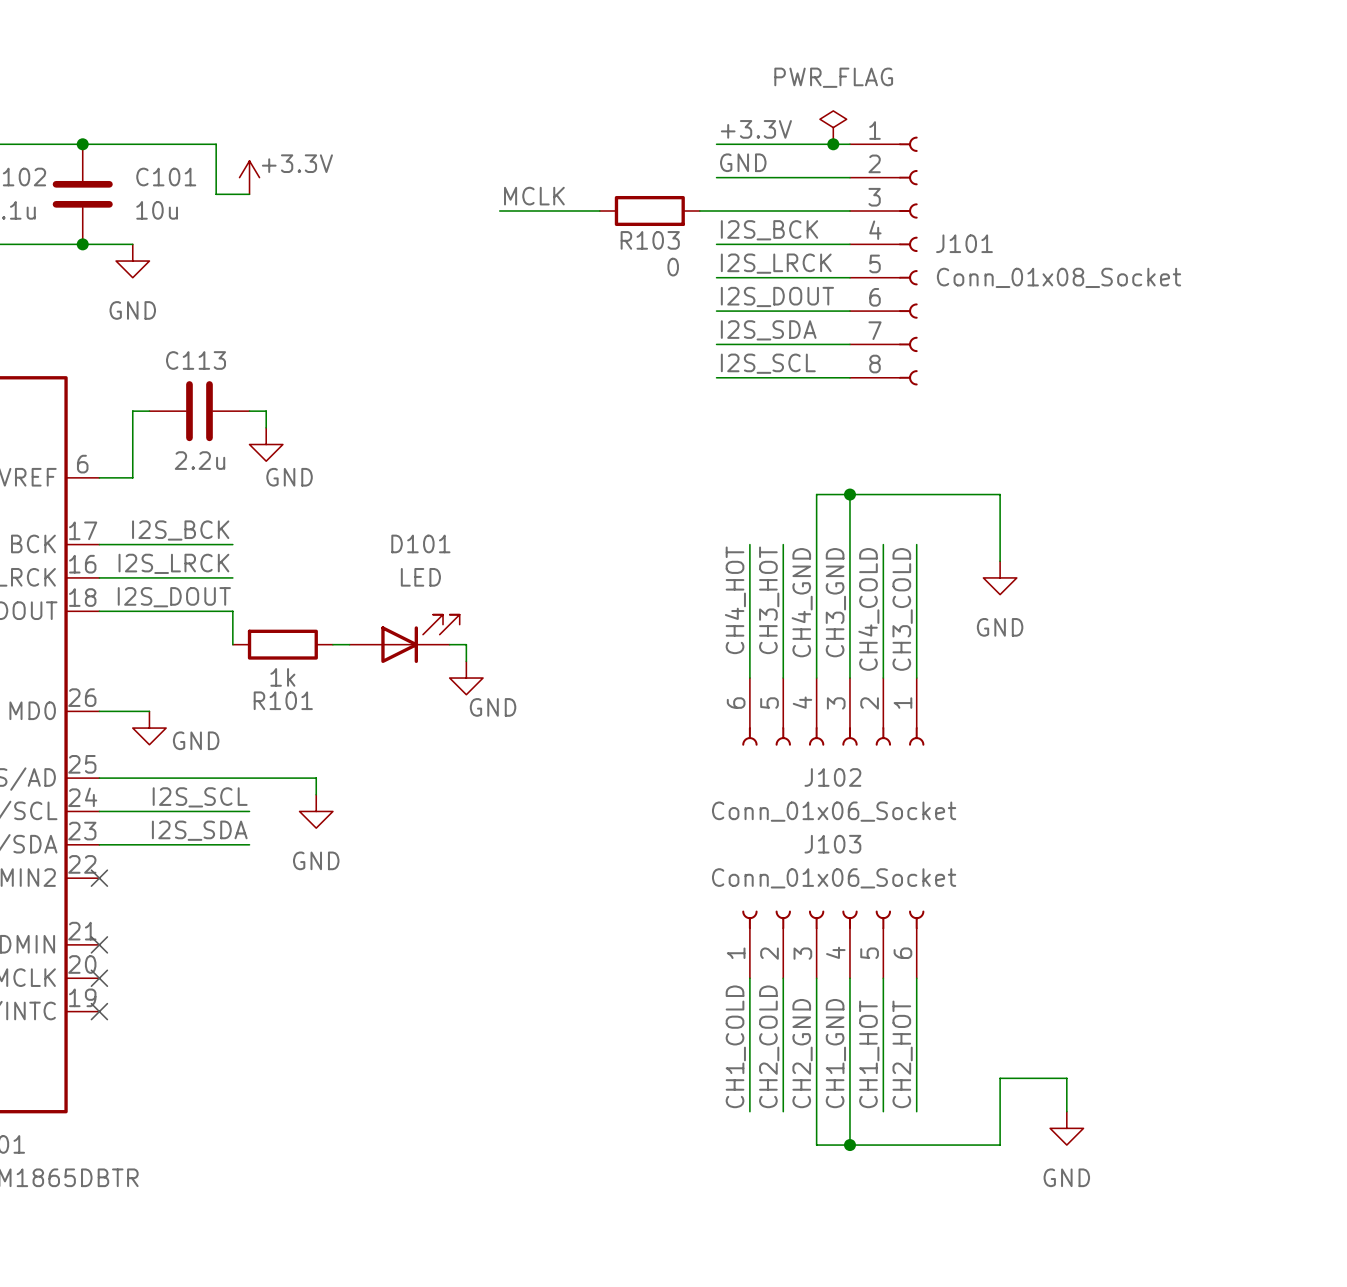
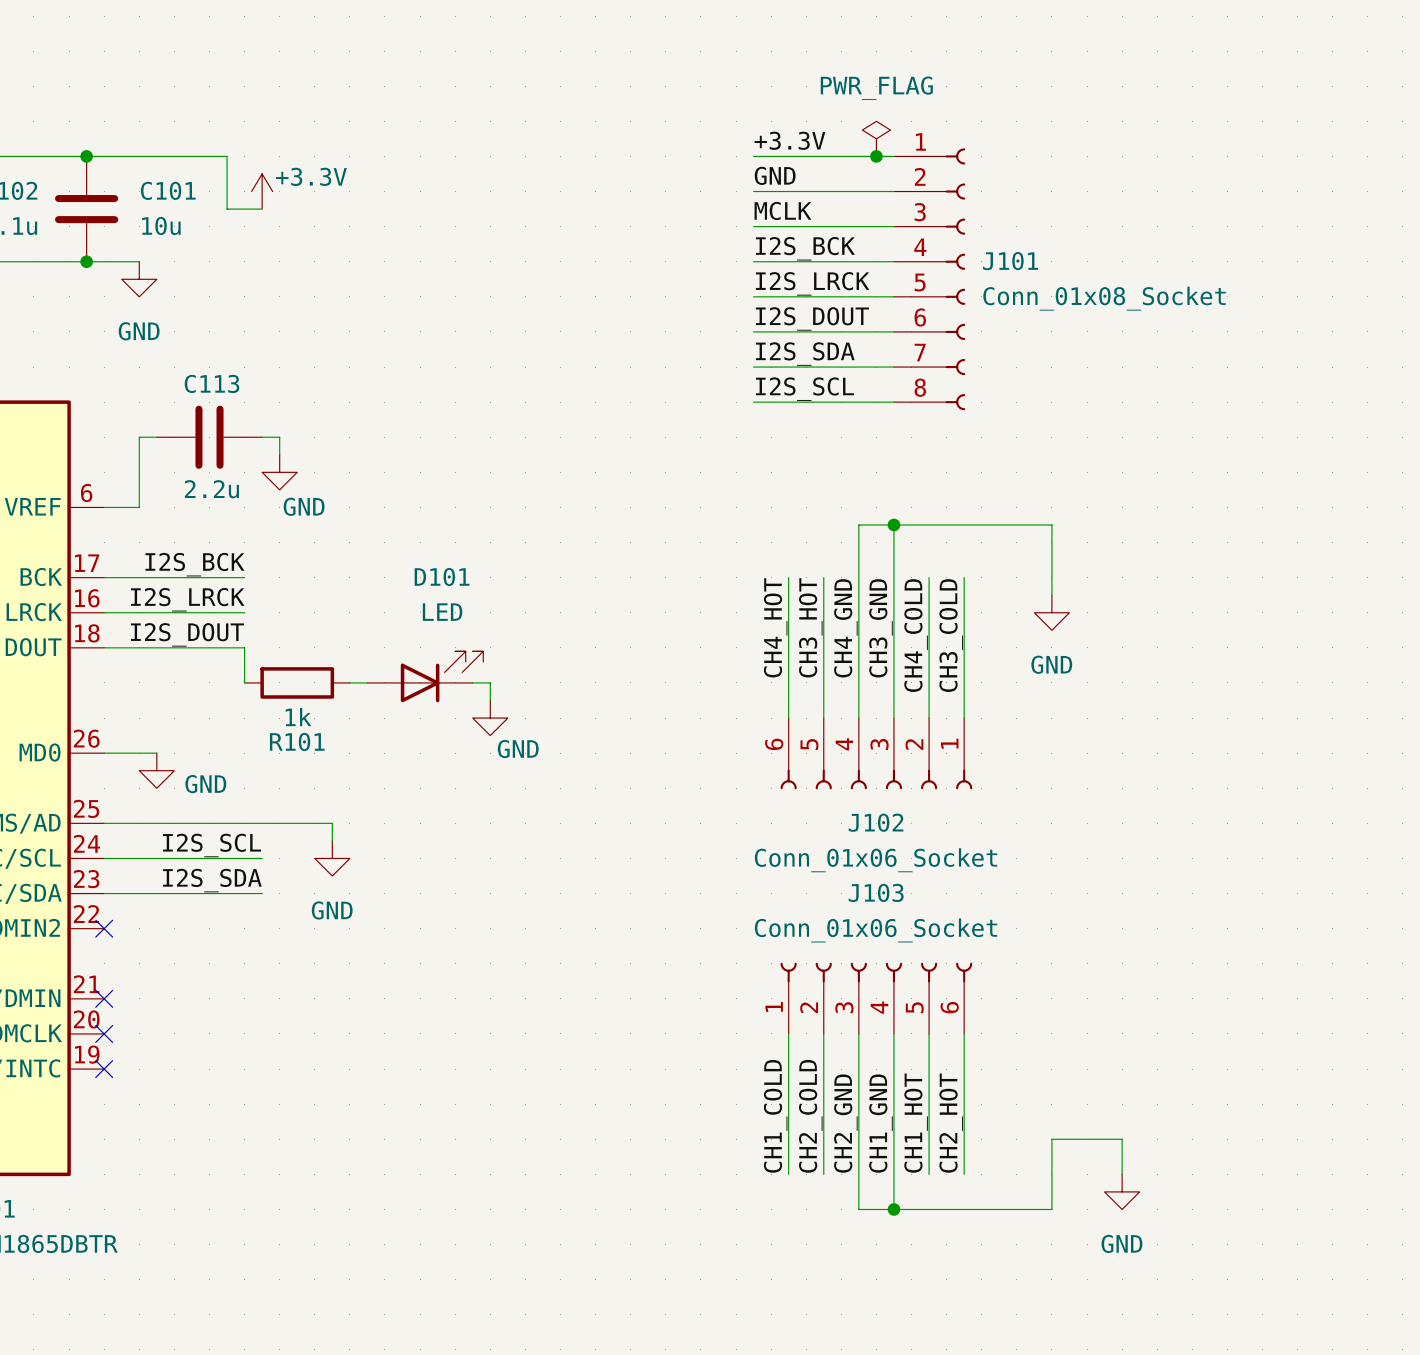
label position: MCLK (534, 196) -> MCLK (783, 210)
wire: (499, 210) (599, 210) -> none
R103: 0 (649, 210) -> none
wire: (699, 210) (716, 210) -> none

